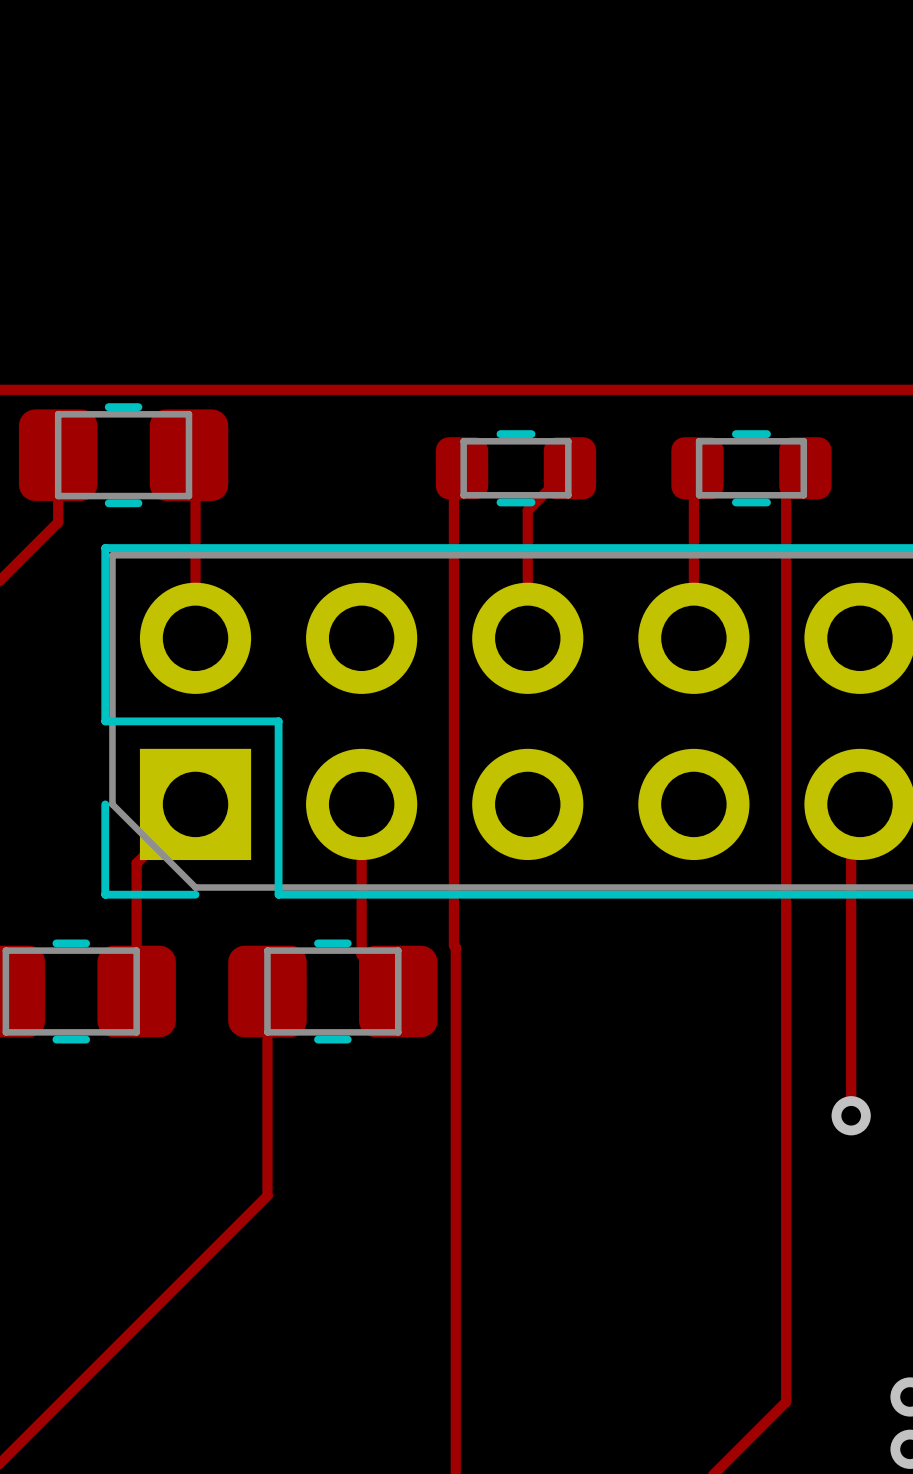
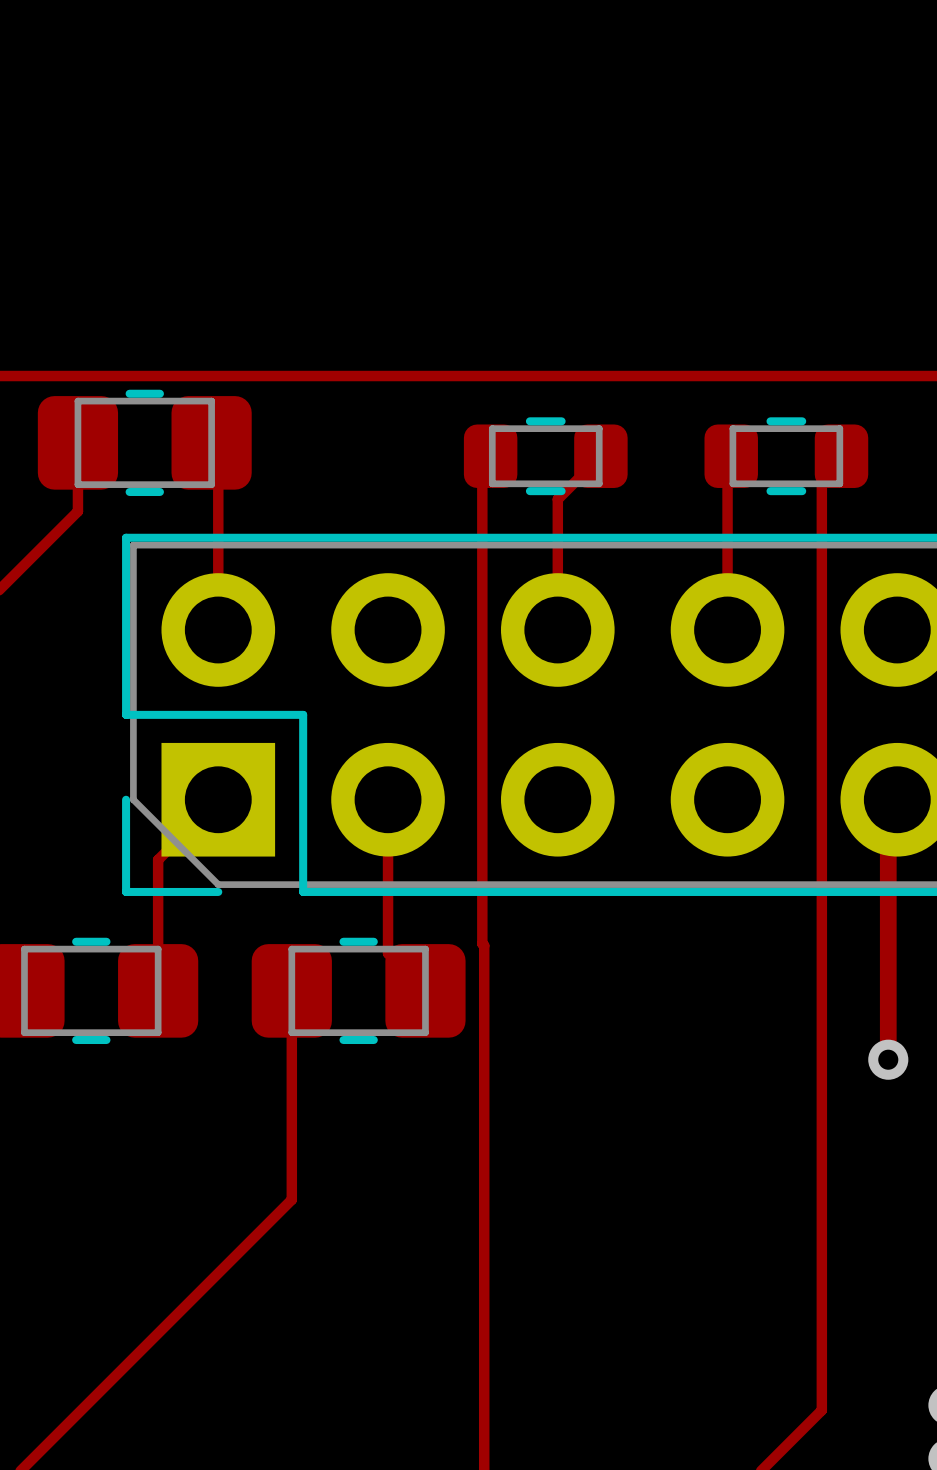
track width: thin (851, 813) (851, 1058) -> thick (888, 808) (888, 1059)
track: (851, 1058) (851, 1115) -> none
via position: (851, 1115) -> (888, 1059)

